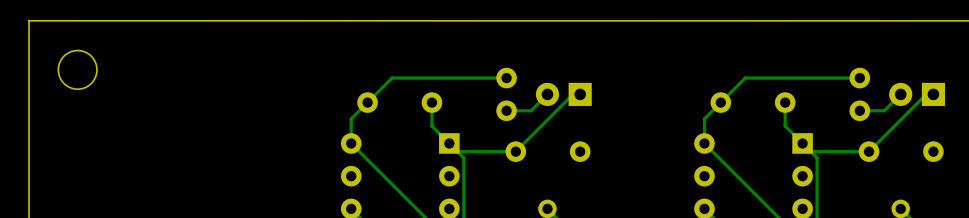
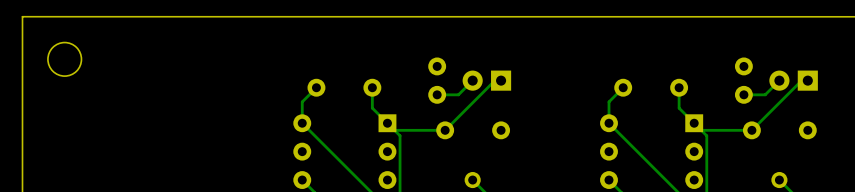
track: (506, 78) (392, 78) (367, 102) -> none
track: (859, 78) (745, 78) (720, 102) -> none

